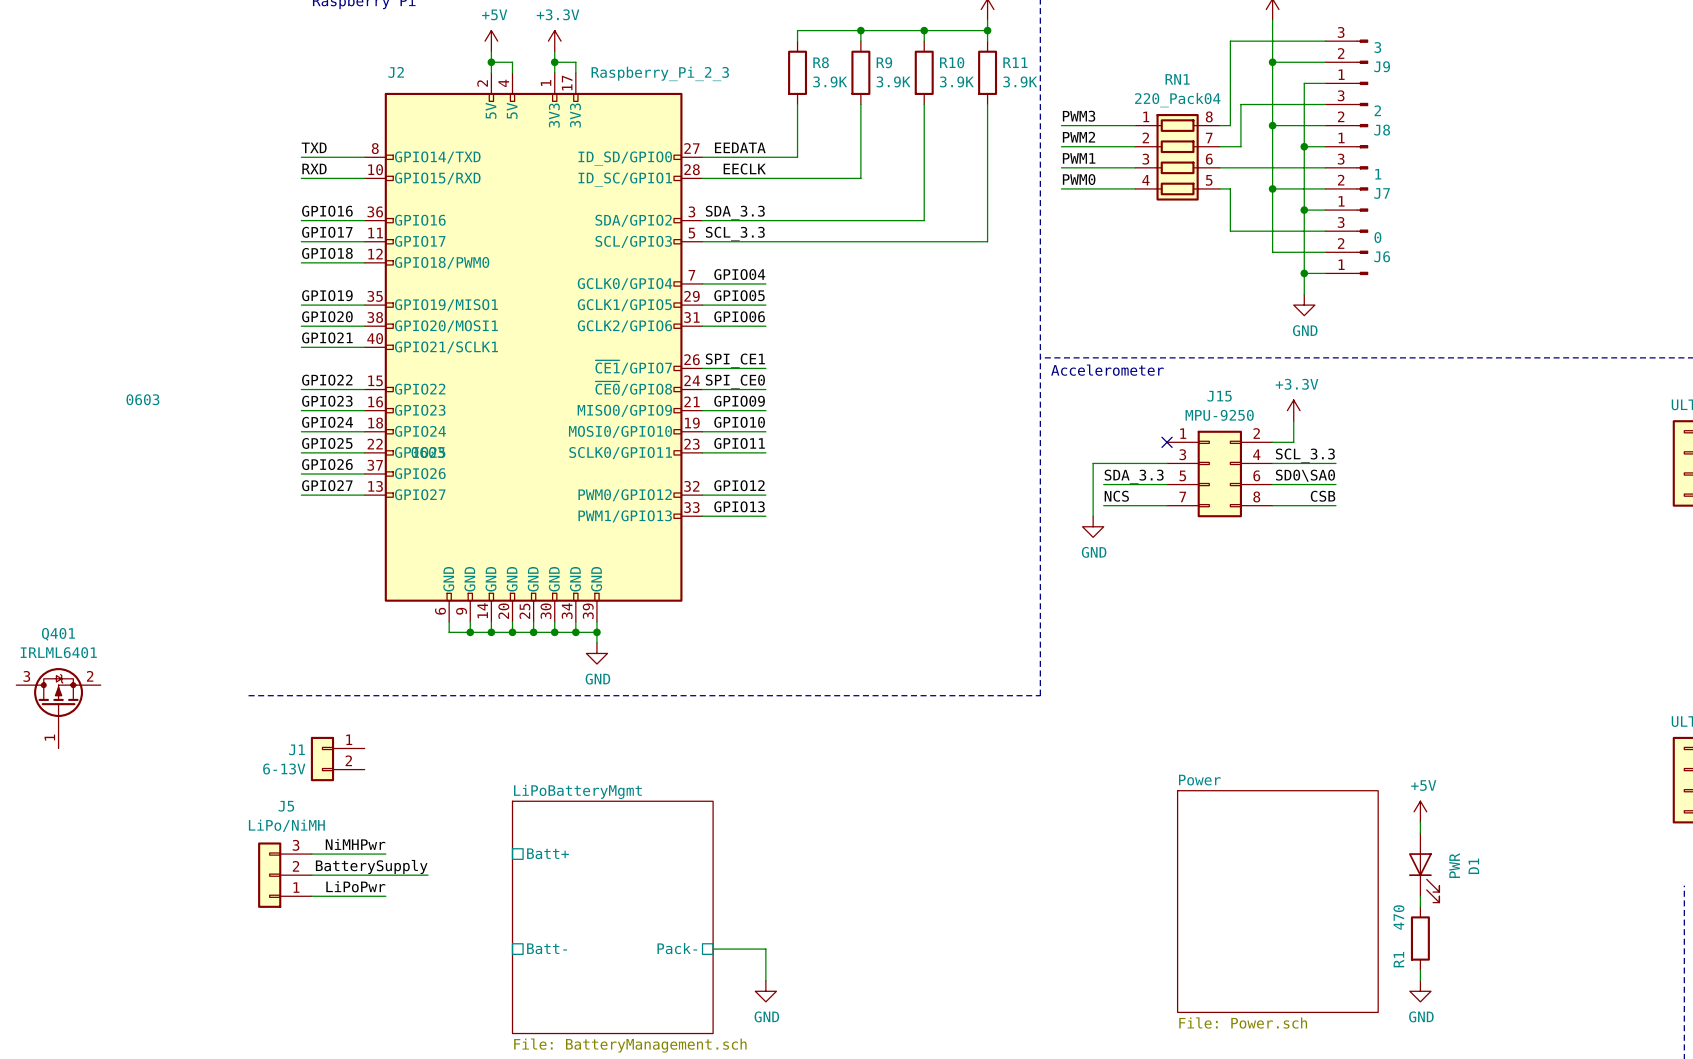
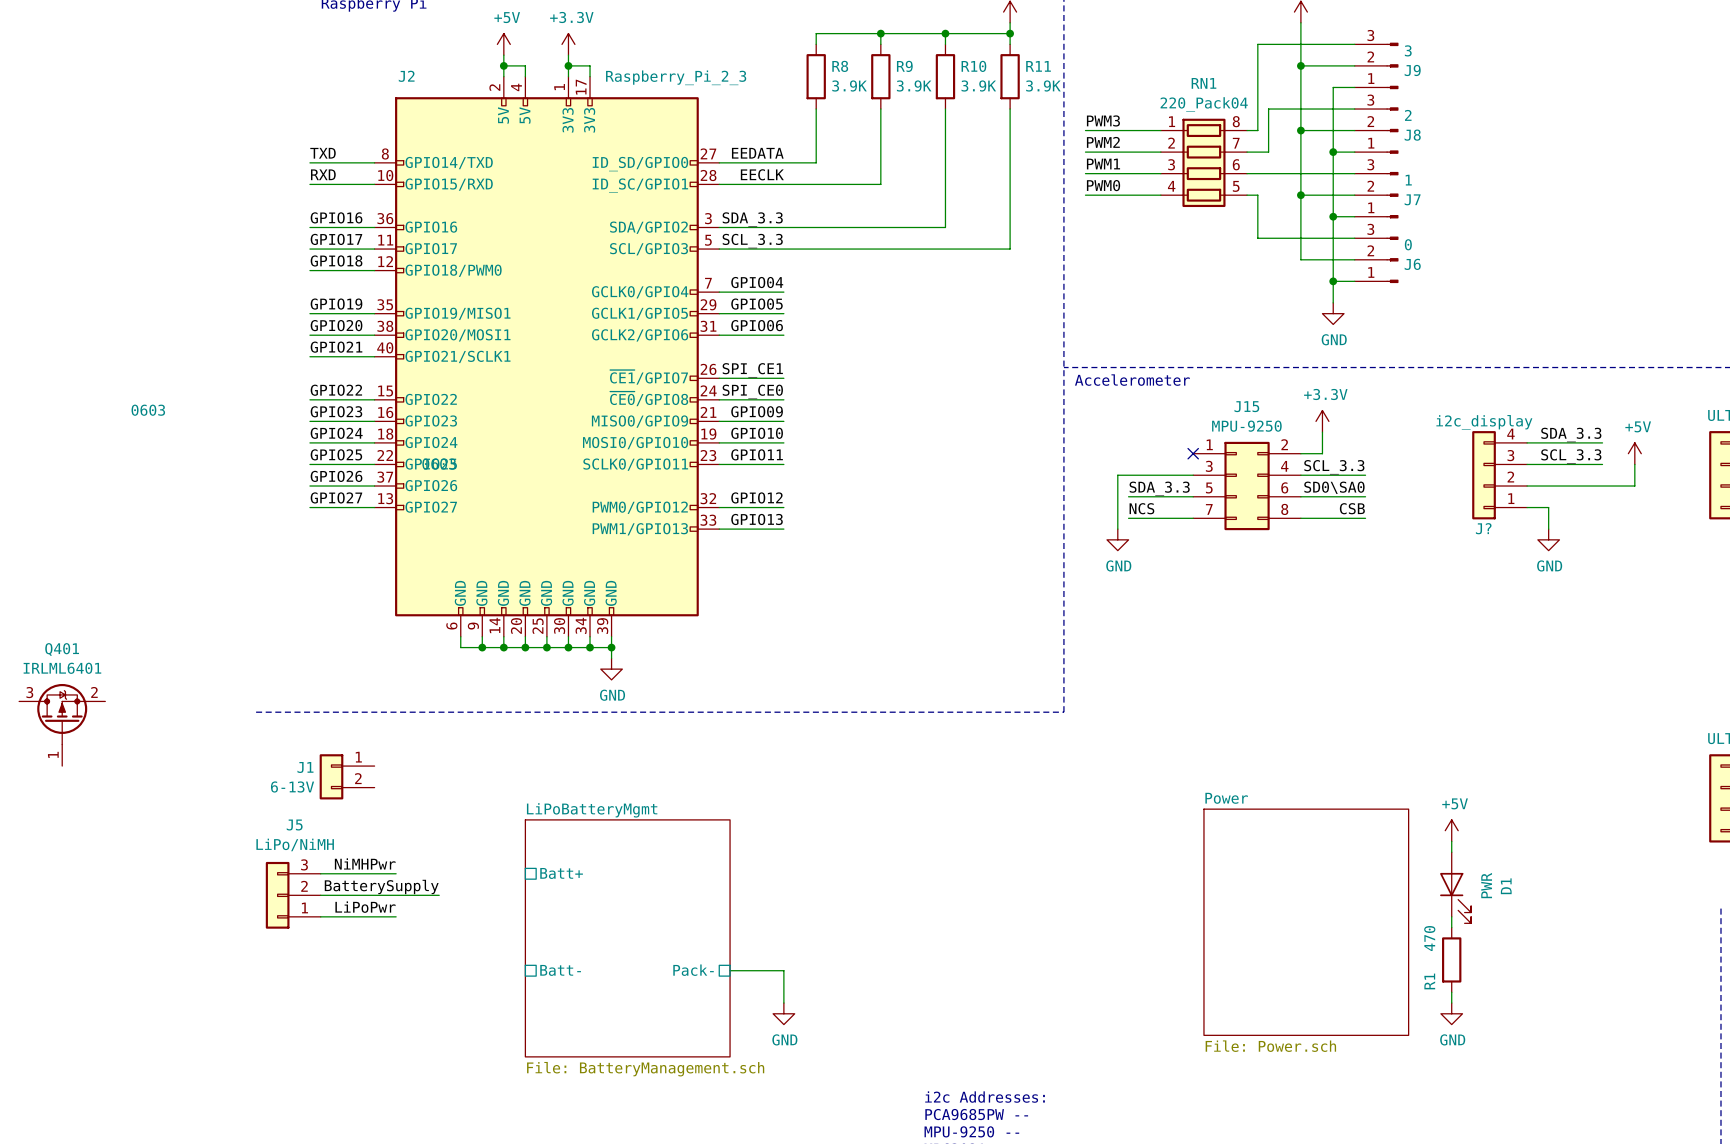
label: none -> SDA_3.3 (1571, 434)
wire: none -> (1527, 442) (1602, 442)
power symbol: none -> +5V (1634, 453)
label: none -> SCL_3.3 (1571, 456)
wire: none -> (1527, 464) (1602, 464)
wire: none -> (1634, 464) (1634, 486) (1527, 486)
J?: none -> i2c_display (1499, 475)
wire: none -> (1527, 507) (1548, 507) (1548, 529)
power symbol: none -> GND (1548, 539)

